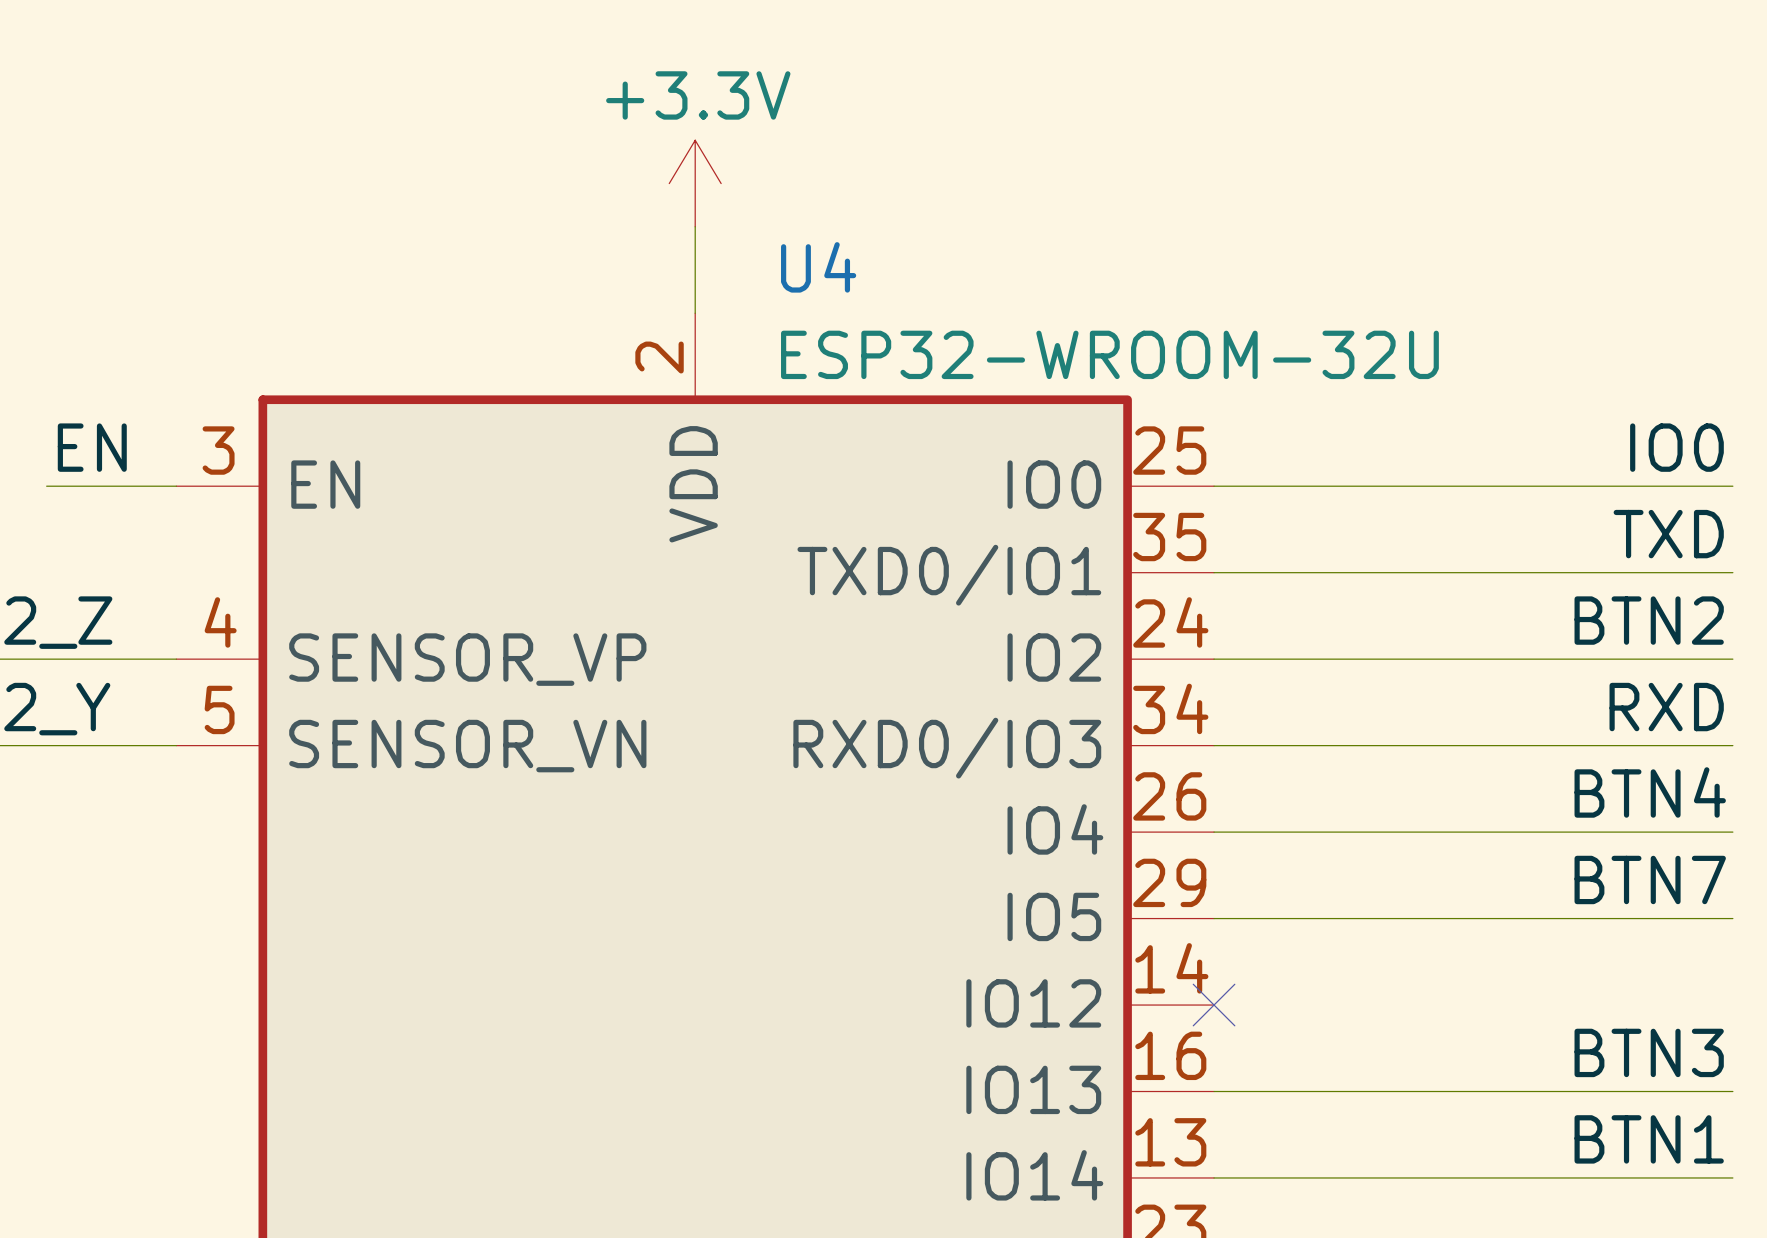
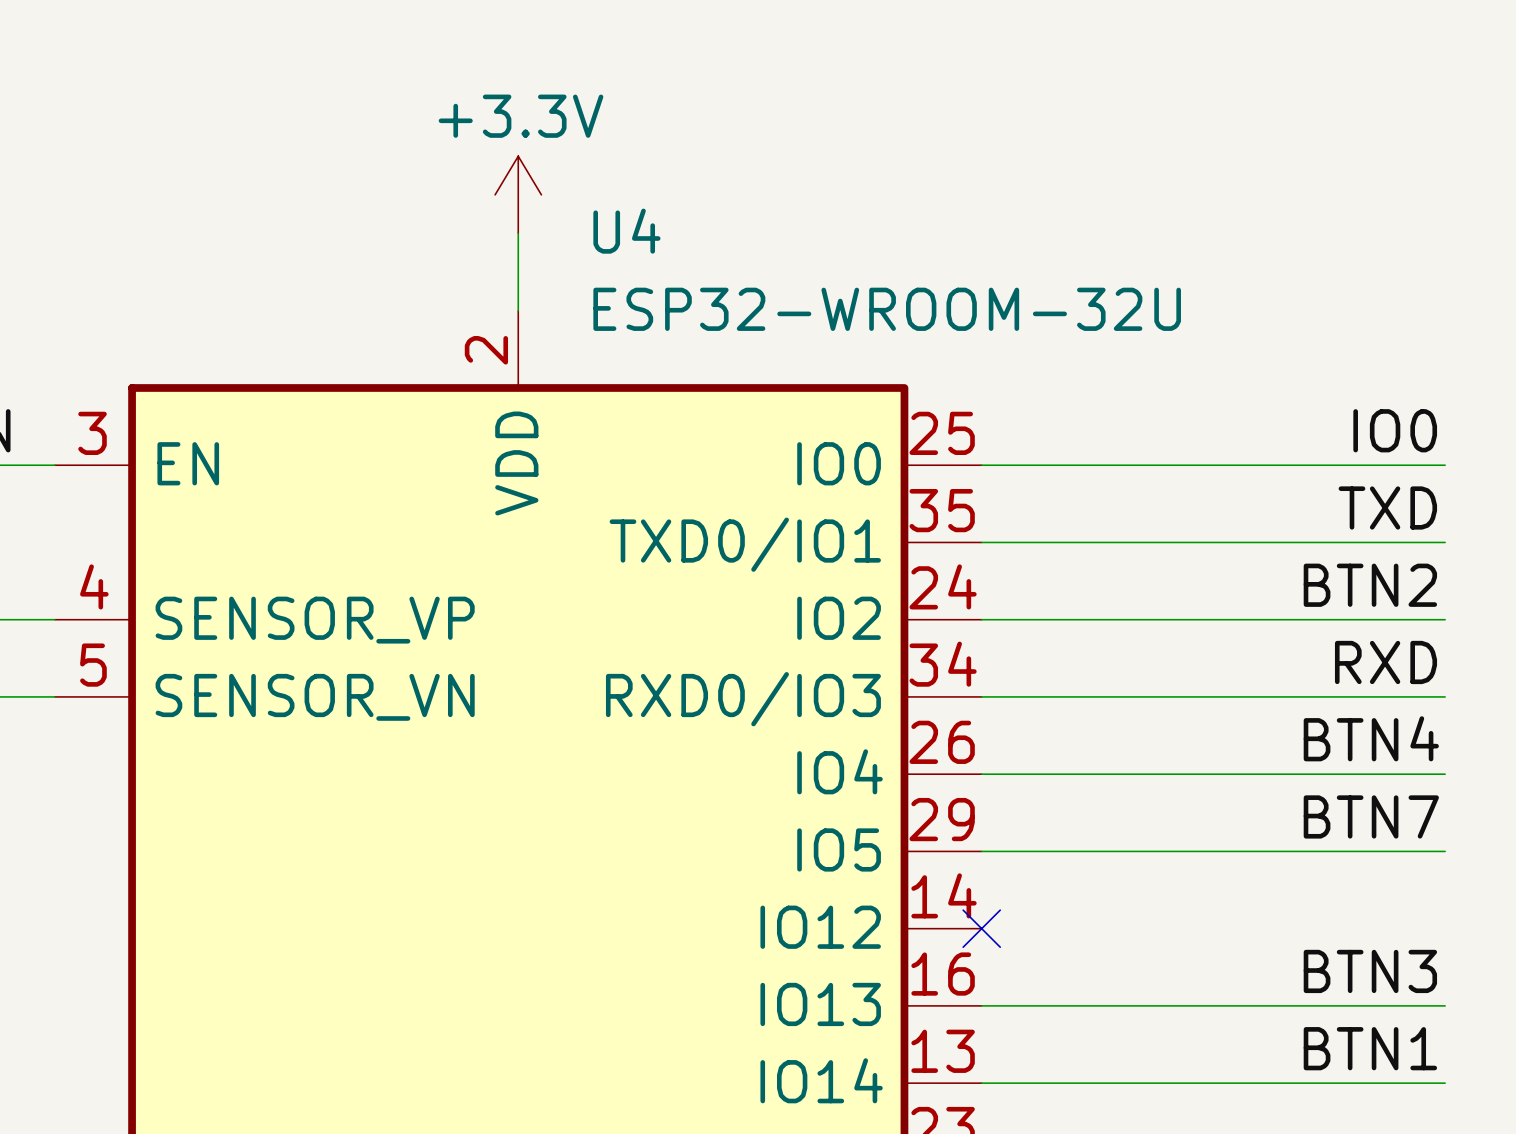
U4 name position: U4 (818, 267) -> U4 (626, 231)
U4 value position: ESP32-WROOM-32U (1109, 354) -> ESP32-WROOM-32U (887, 309)

